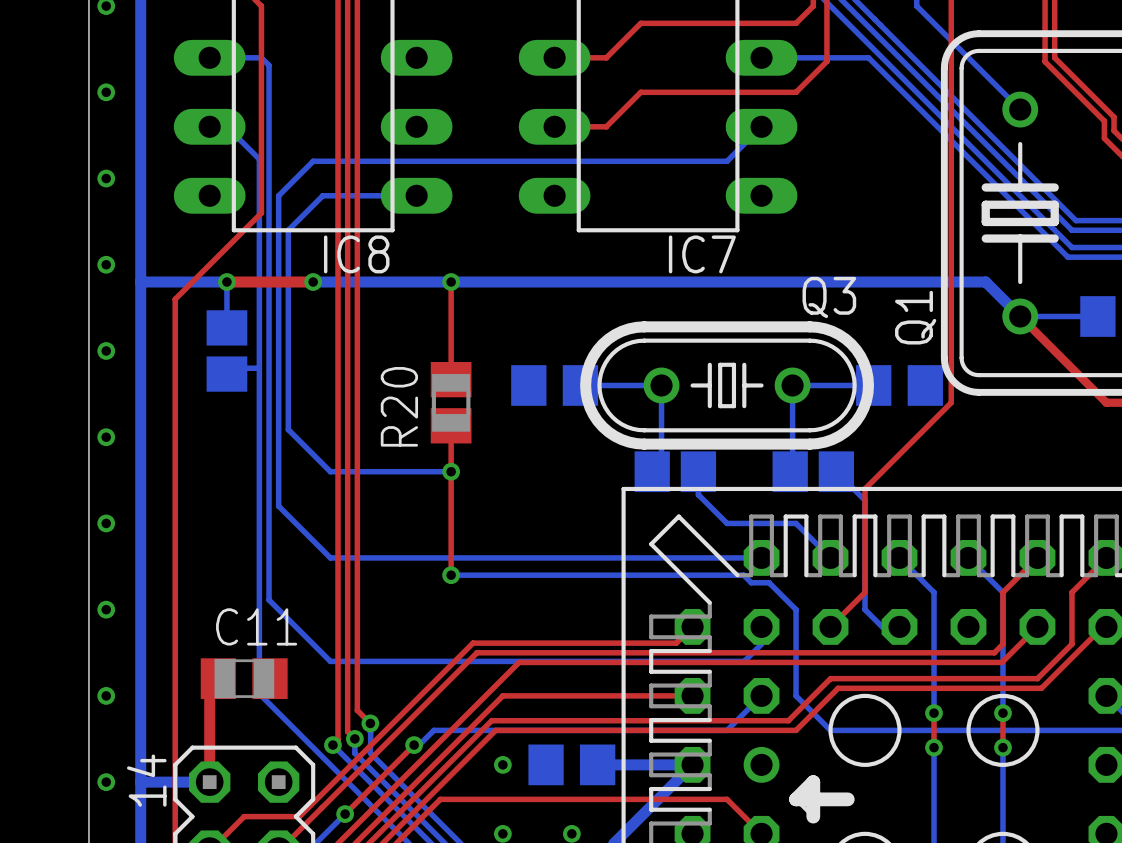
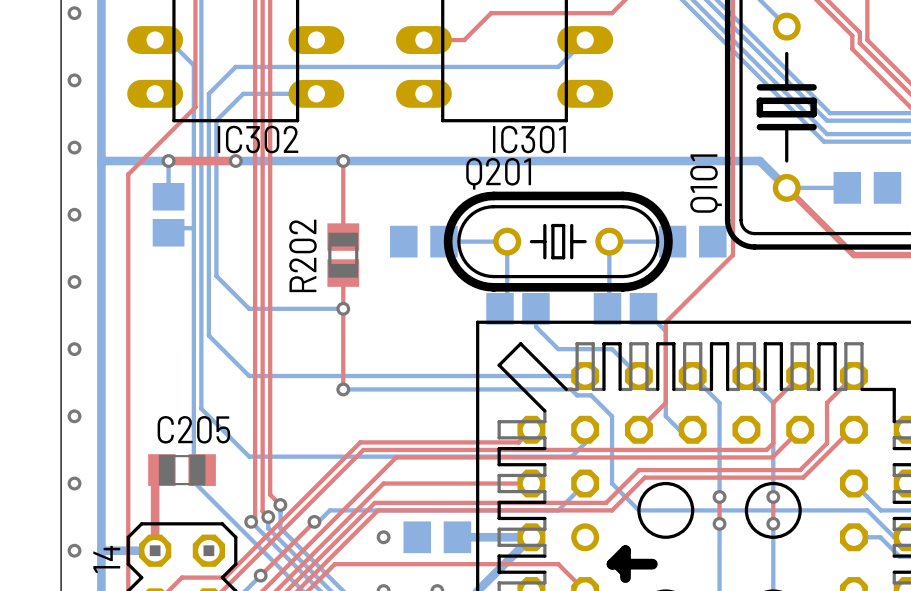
IC8 name: IC8 (356, 254) -> IC302 (258, 139)
IC7 name: IC7 (702, 254) -> IC301 (529, 139)
Q3 name: Q3 (829, 297) -> Q201 (498, 173)
Q1 name: Q1 (915, 317) -> Q101 (705, 183)
R20 name: R20 (399, 406) -> R202 (302, 255)
C11 name: C11 (256, 626) -> C205 (193, 429)

